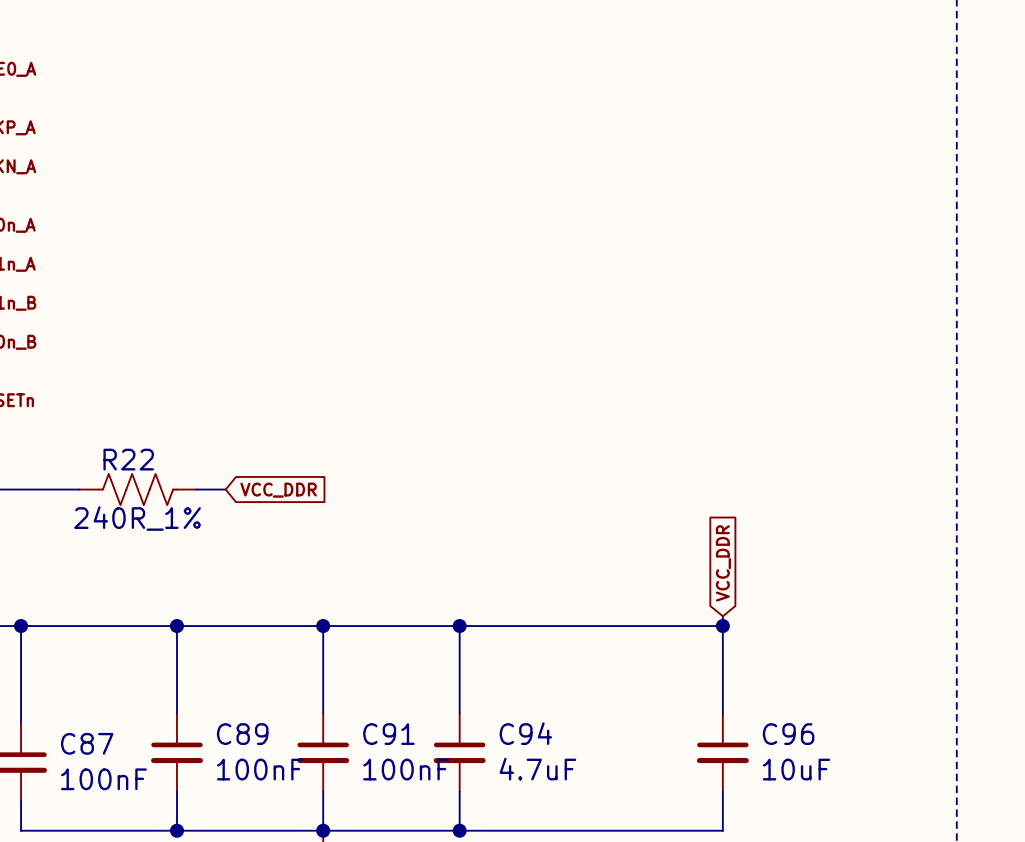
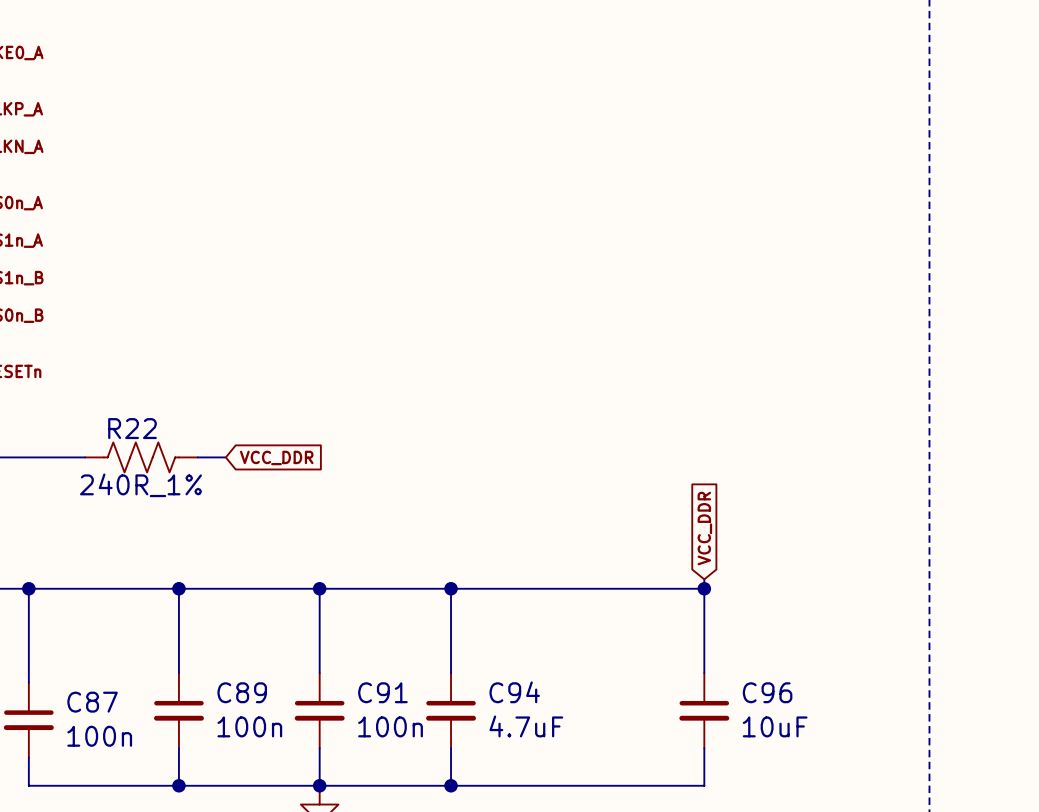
C89 value: 100nF (259, 769) -> 100n (249, 726)
C91 value: 100nF (406, 769) -> 100n (390, 726)
C87 value: 100nF (103, 779) -> 100n (99, 736)

